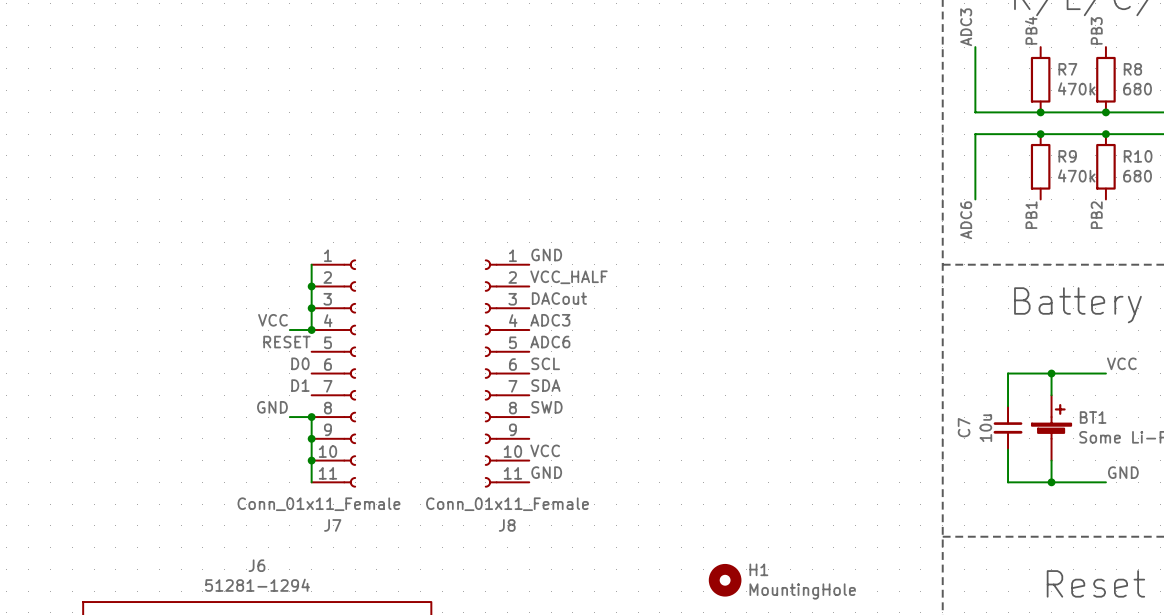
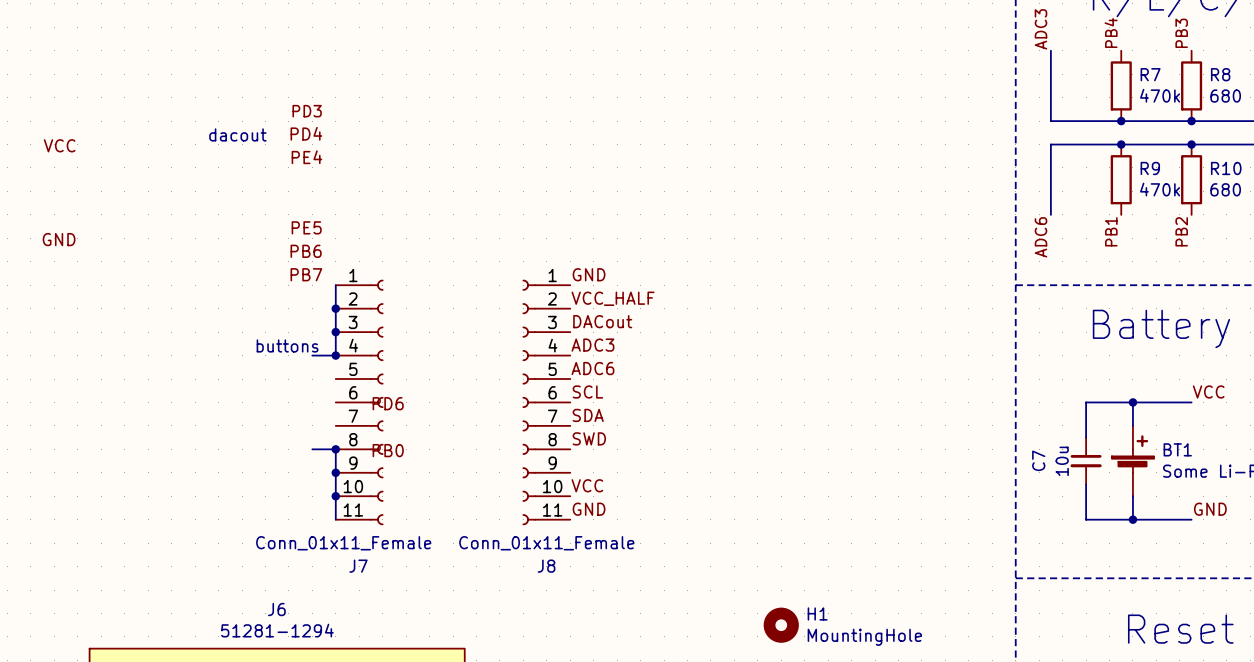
label: none -> PD3 (307, 111)
label: none -> PD4 (306, 133)
text: none -> dacout (237, 134)
label: none -> VCC (59, 145)
label: none -> PE4 (306, 157)
label: none -> PE5 (306, 227)
label: none -> GND (59, 239)
label: none -> PB6 (306, 251)
label: none -> PB7 (306, 274)
label: VCC (272, 320) -> none
text: none -> buttons (287, 345)
label: RESET (286, 342) -> none
label: D0 (300, 363) -> none
label: none -> PD6 (388, 403)
label: D1 (300, 385) -> none
label: GND (272, 407) -> none
label: none -> PB0 (388, 450)

